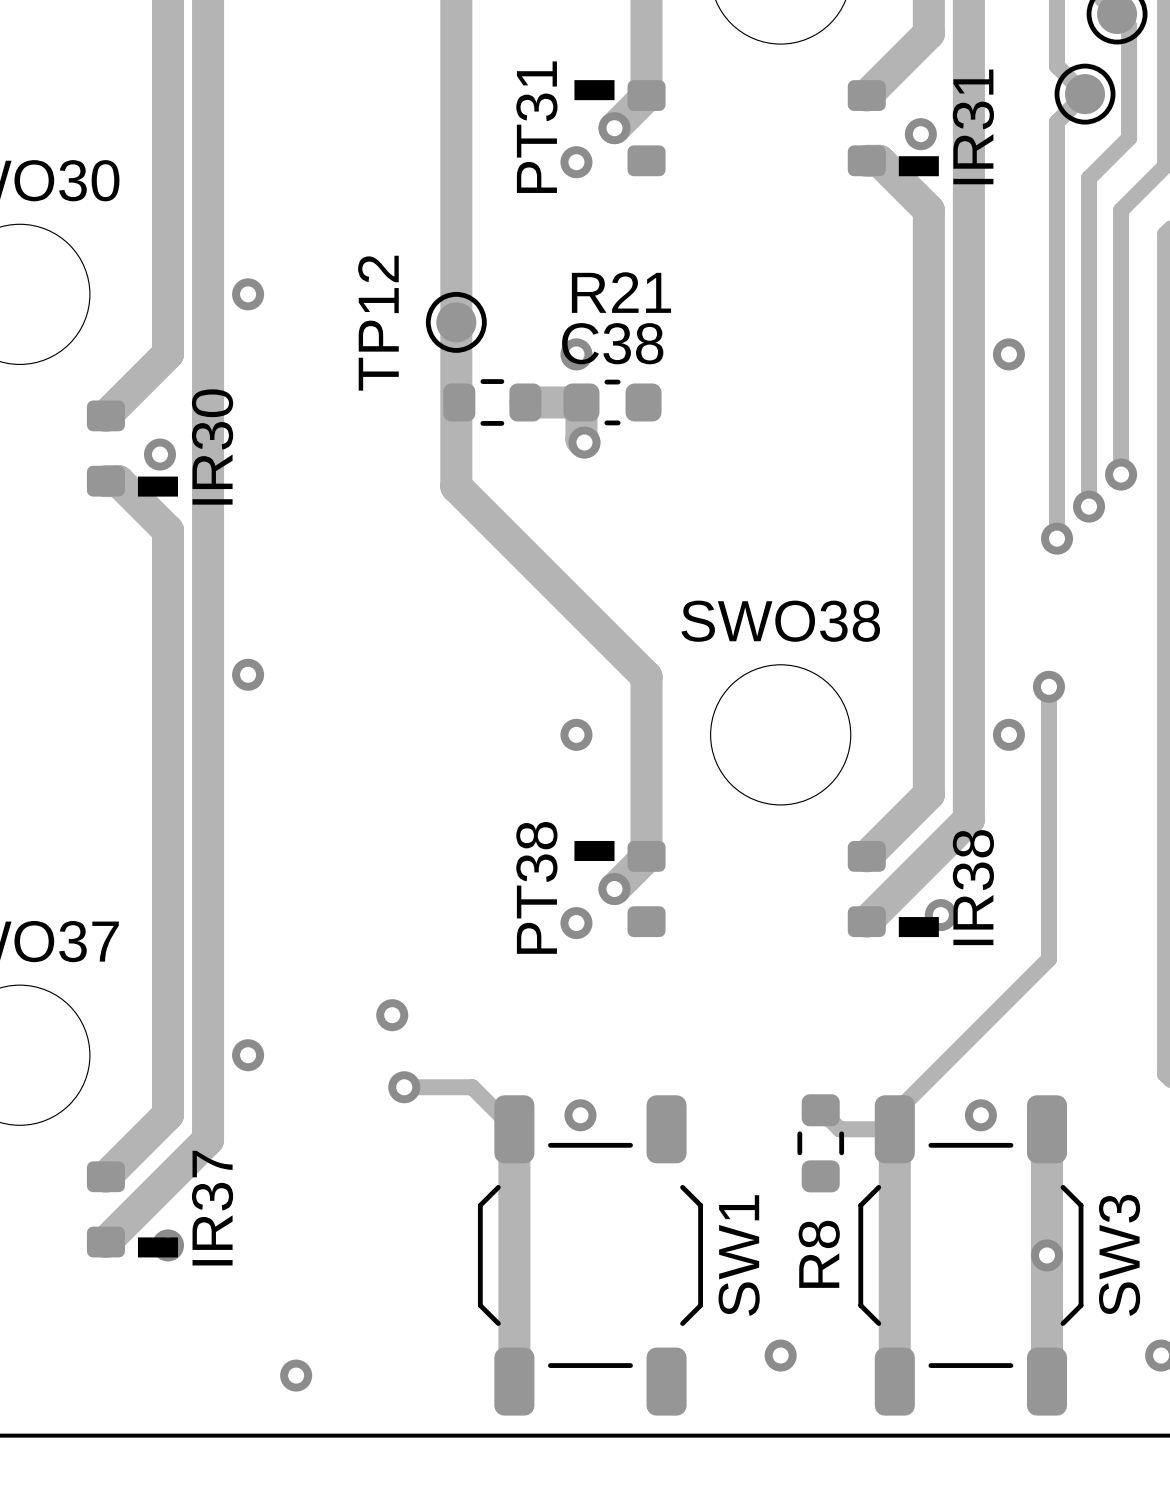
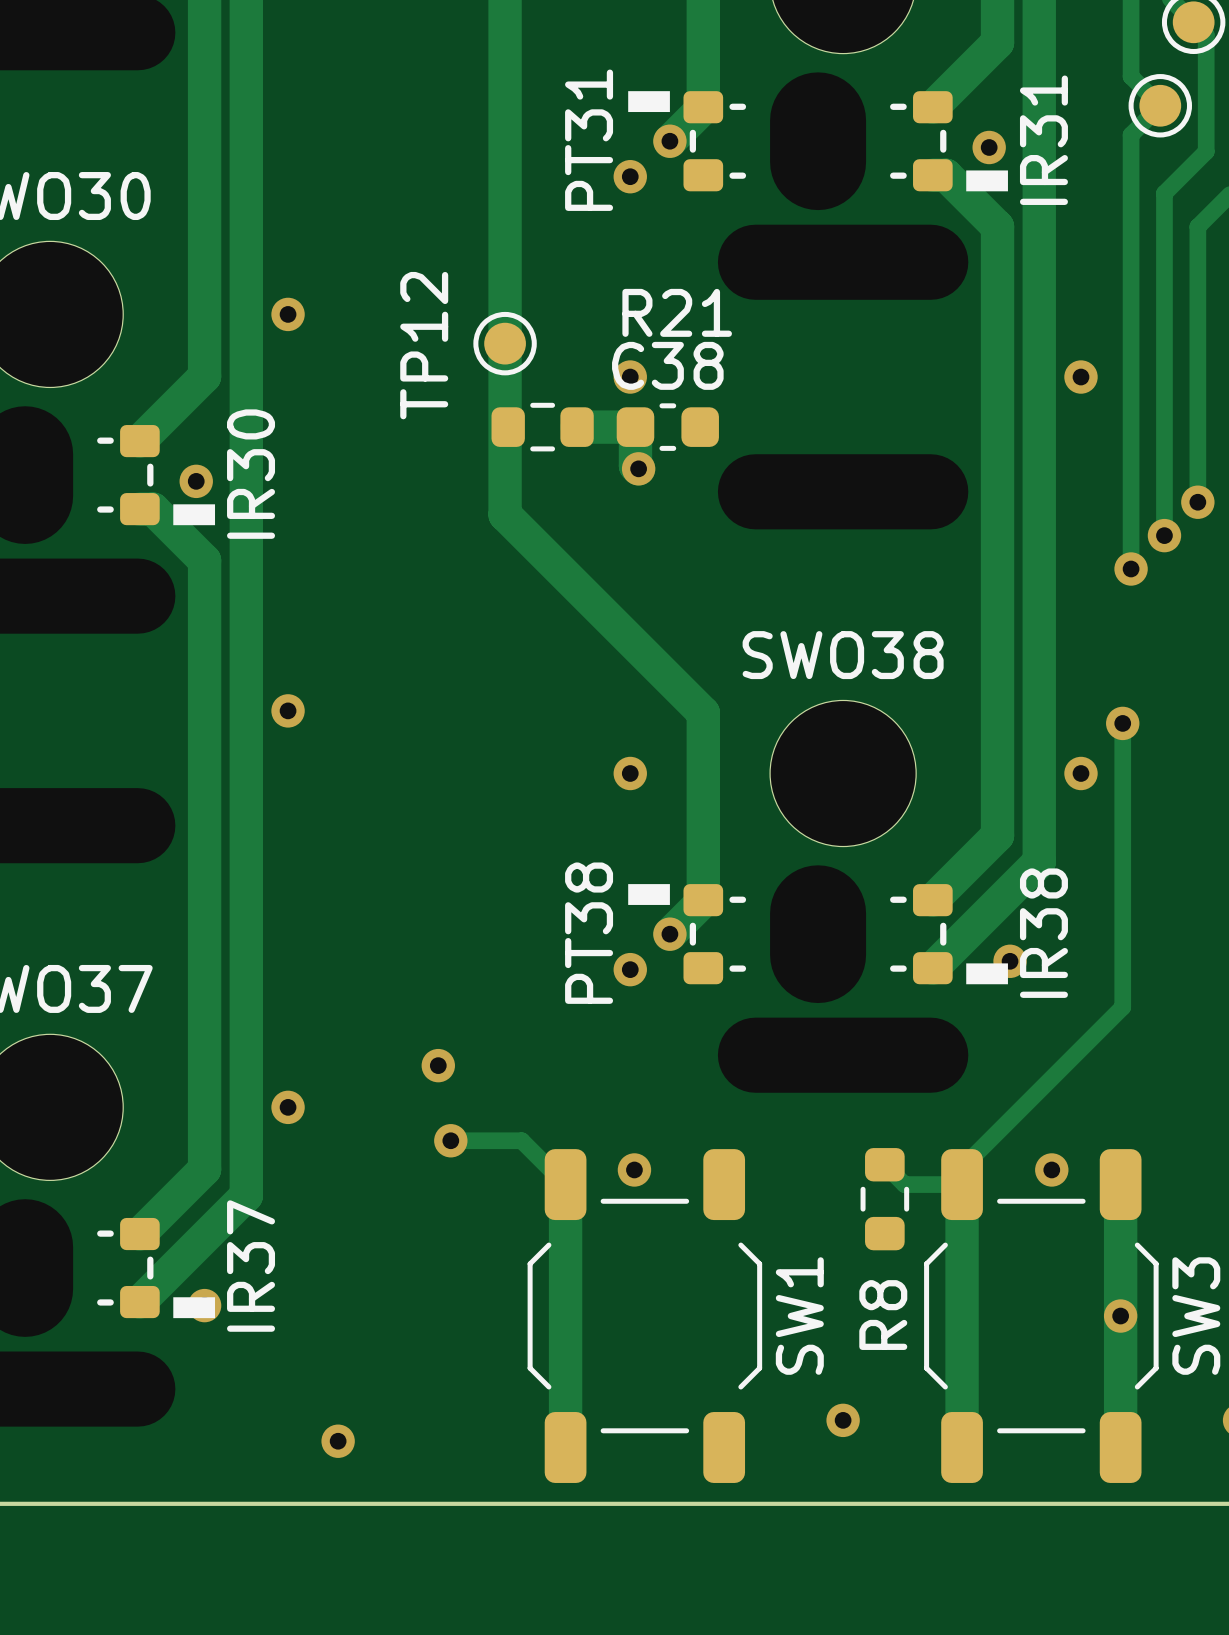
PT31 footprint: [574, 80, 666, 177] -> [628, 91, 747, 192]
IR31 footprint: [847, 80, 939, 177] -> [890, 91, 1008, 192]
IR30 footprint: [86, 400, 179, 497] -> [97, 425, 216, 526]
PT38 footprint: [574, 840, 666, 938] -> [628, 884, 747, 985]
IR38 footprint: [847, 840, 939, 938] -> [890, 884, 1008, 985]
IR37 footprint: [86, 1161, 179, 1258] -> [97, 1217, 216, 1319]

